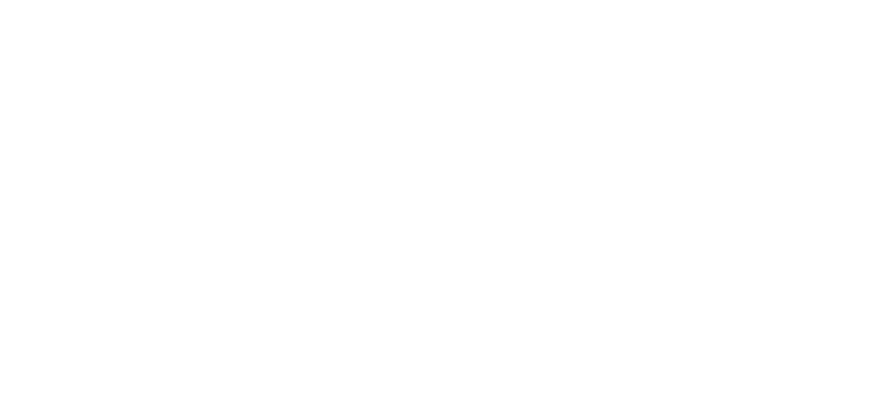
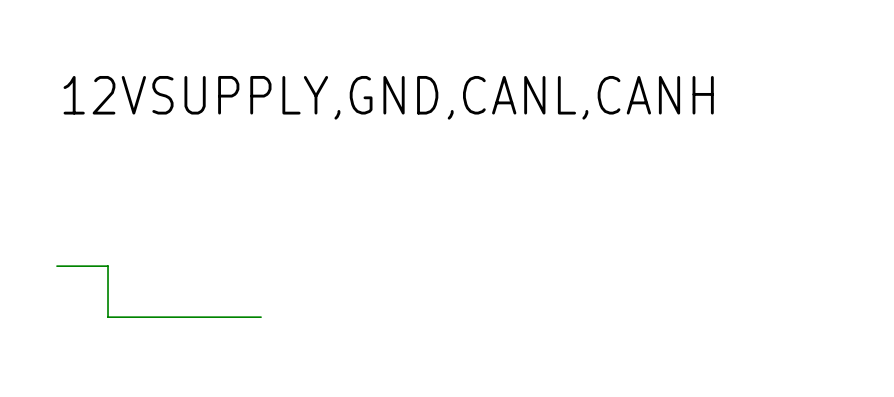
label: none -> 12VSUPPLY,GND,CANL,CANH (388, 97)
wire: none -> (56, 266) (108, 266) (108, 317) (261, 317)

